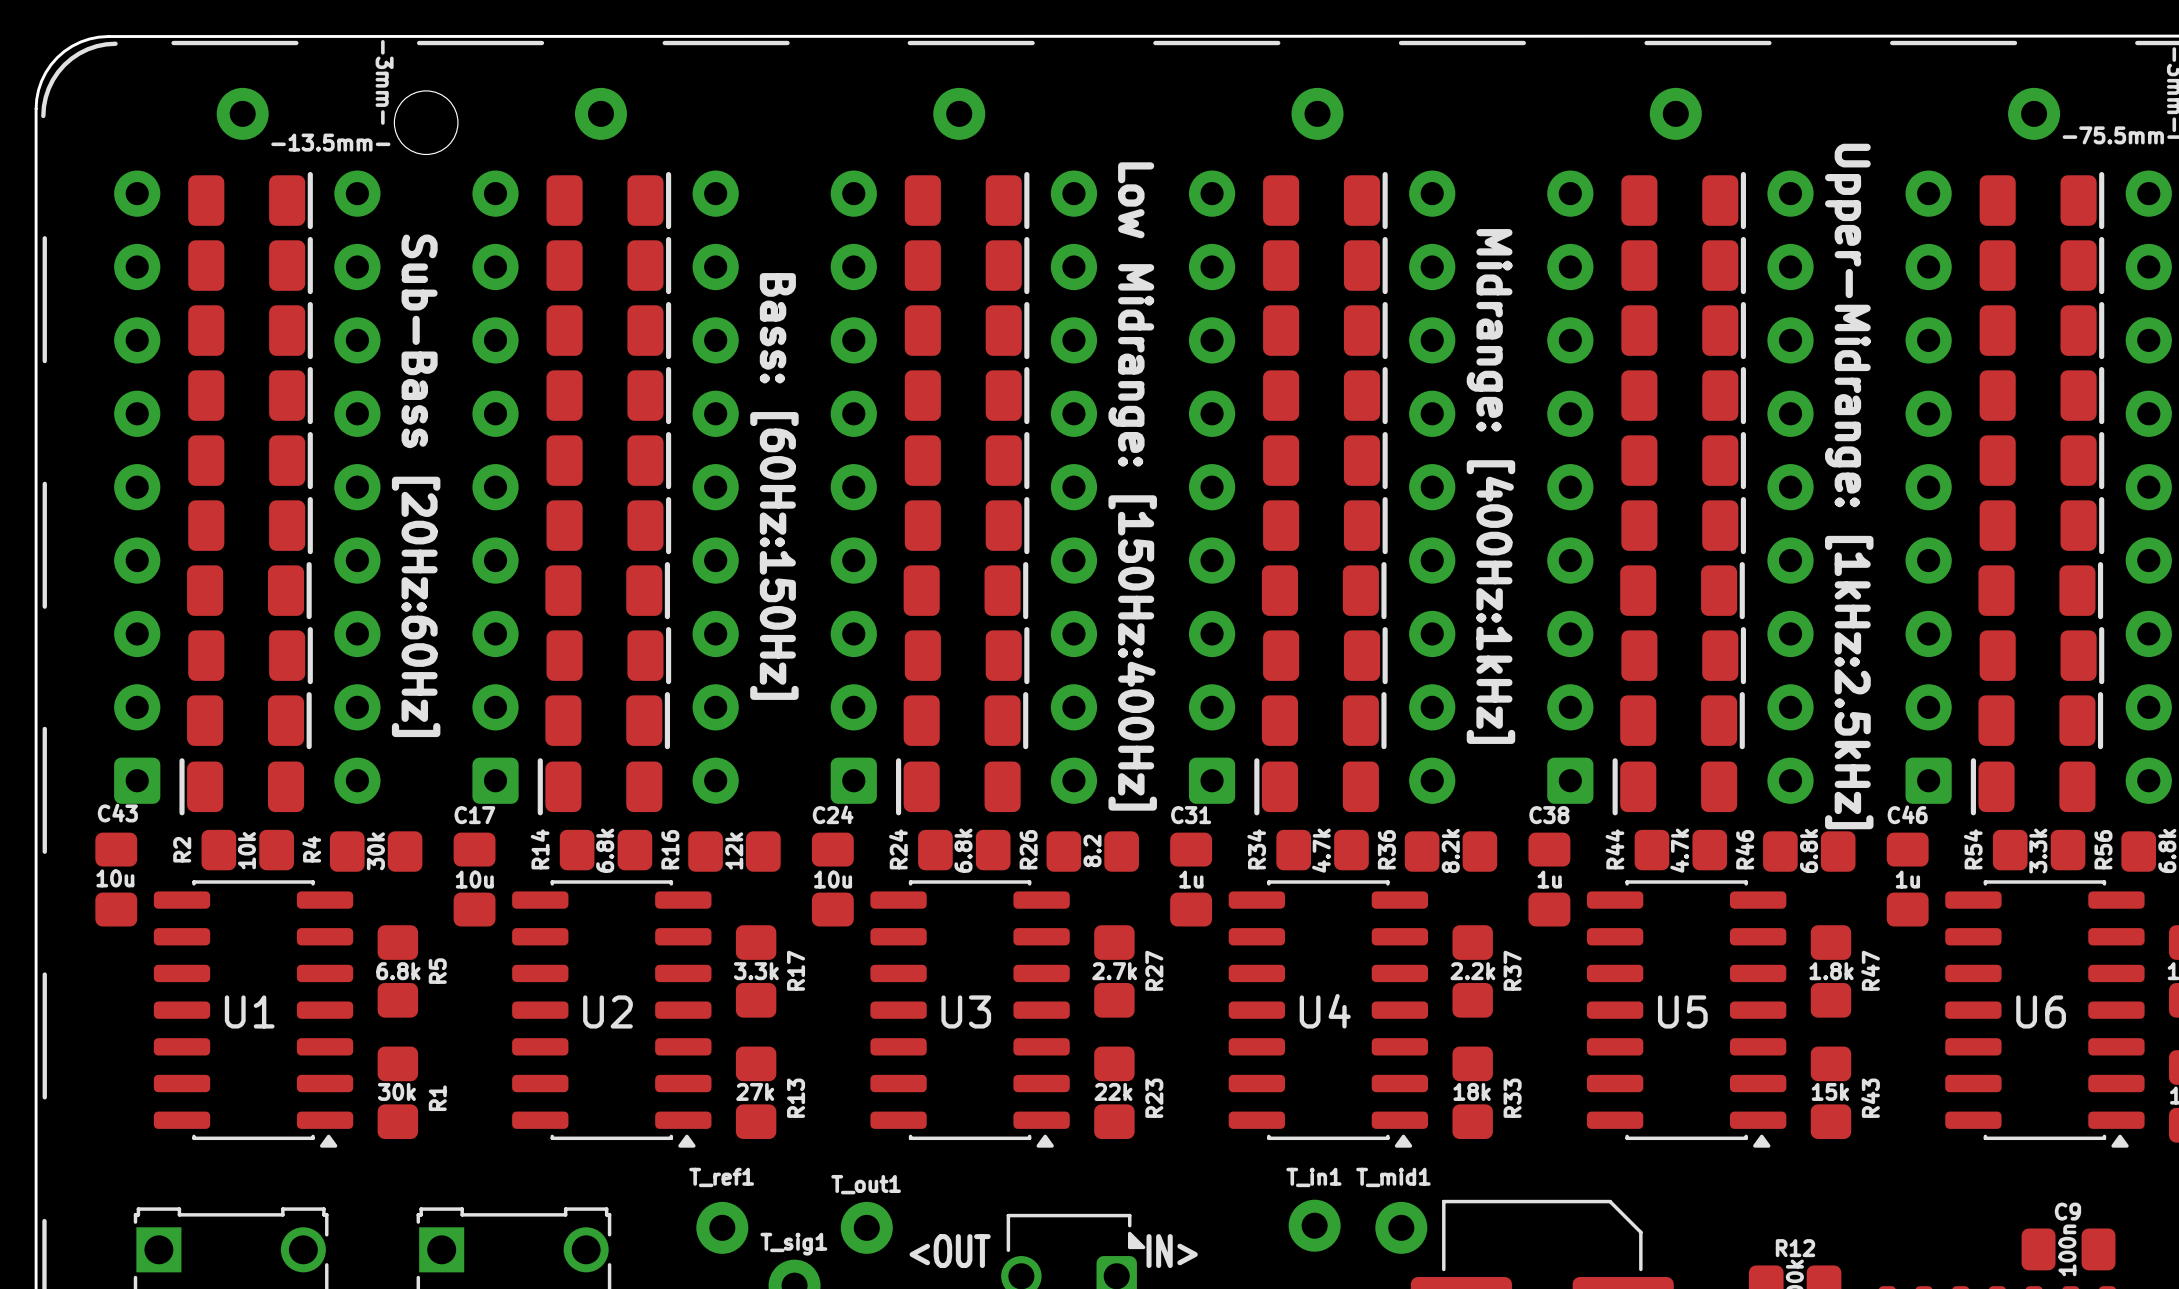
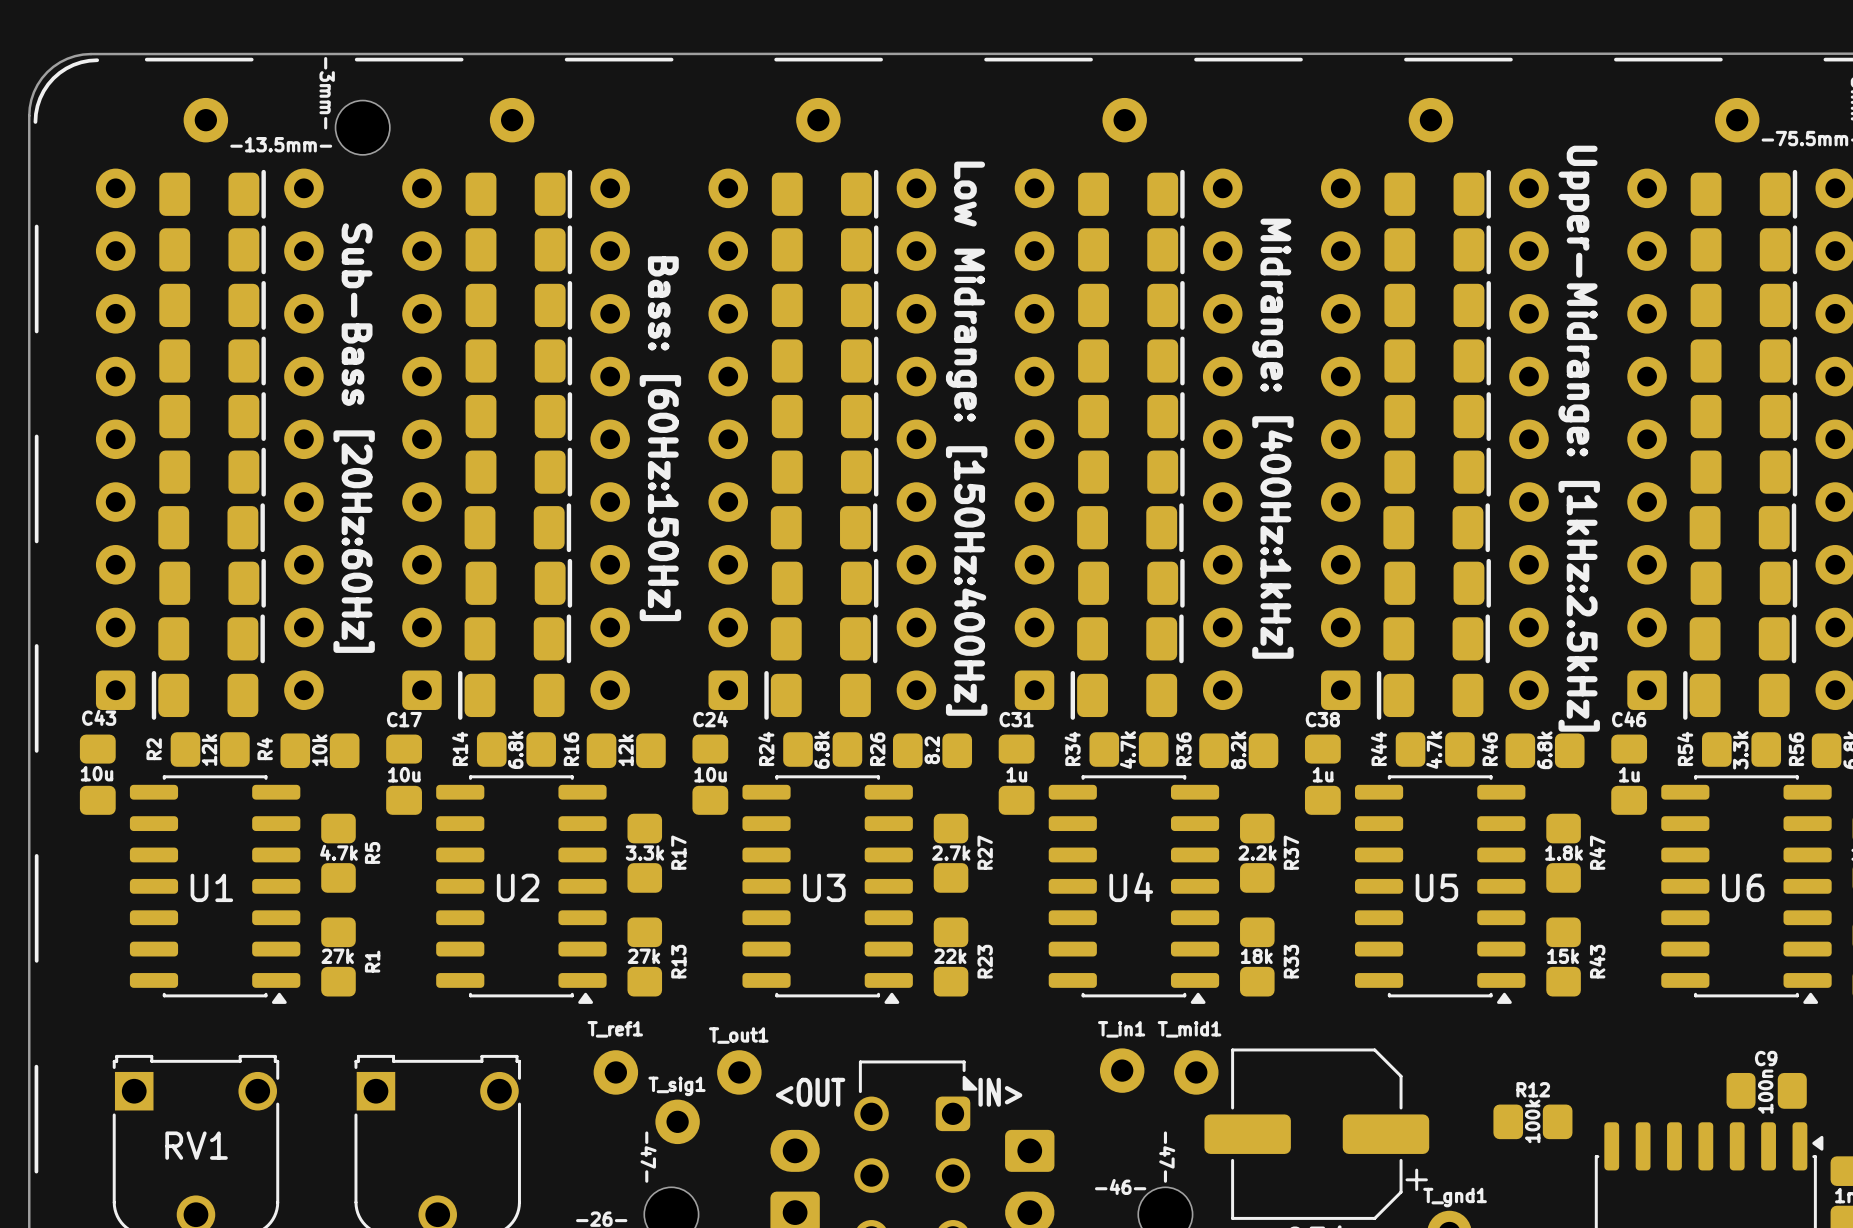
R2 value: 10k (246, 850) -> 12k (209, 750)
R4 value: 30k (375, 851) -> 10k (319, 750)
R5 value: 6.8k (398, 971) -> 4.7k (338, 852)
R1 value: 30k (396, 1091) -> 27k (337, 956)

